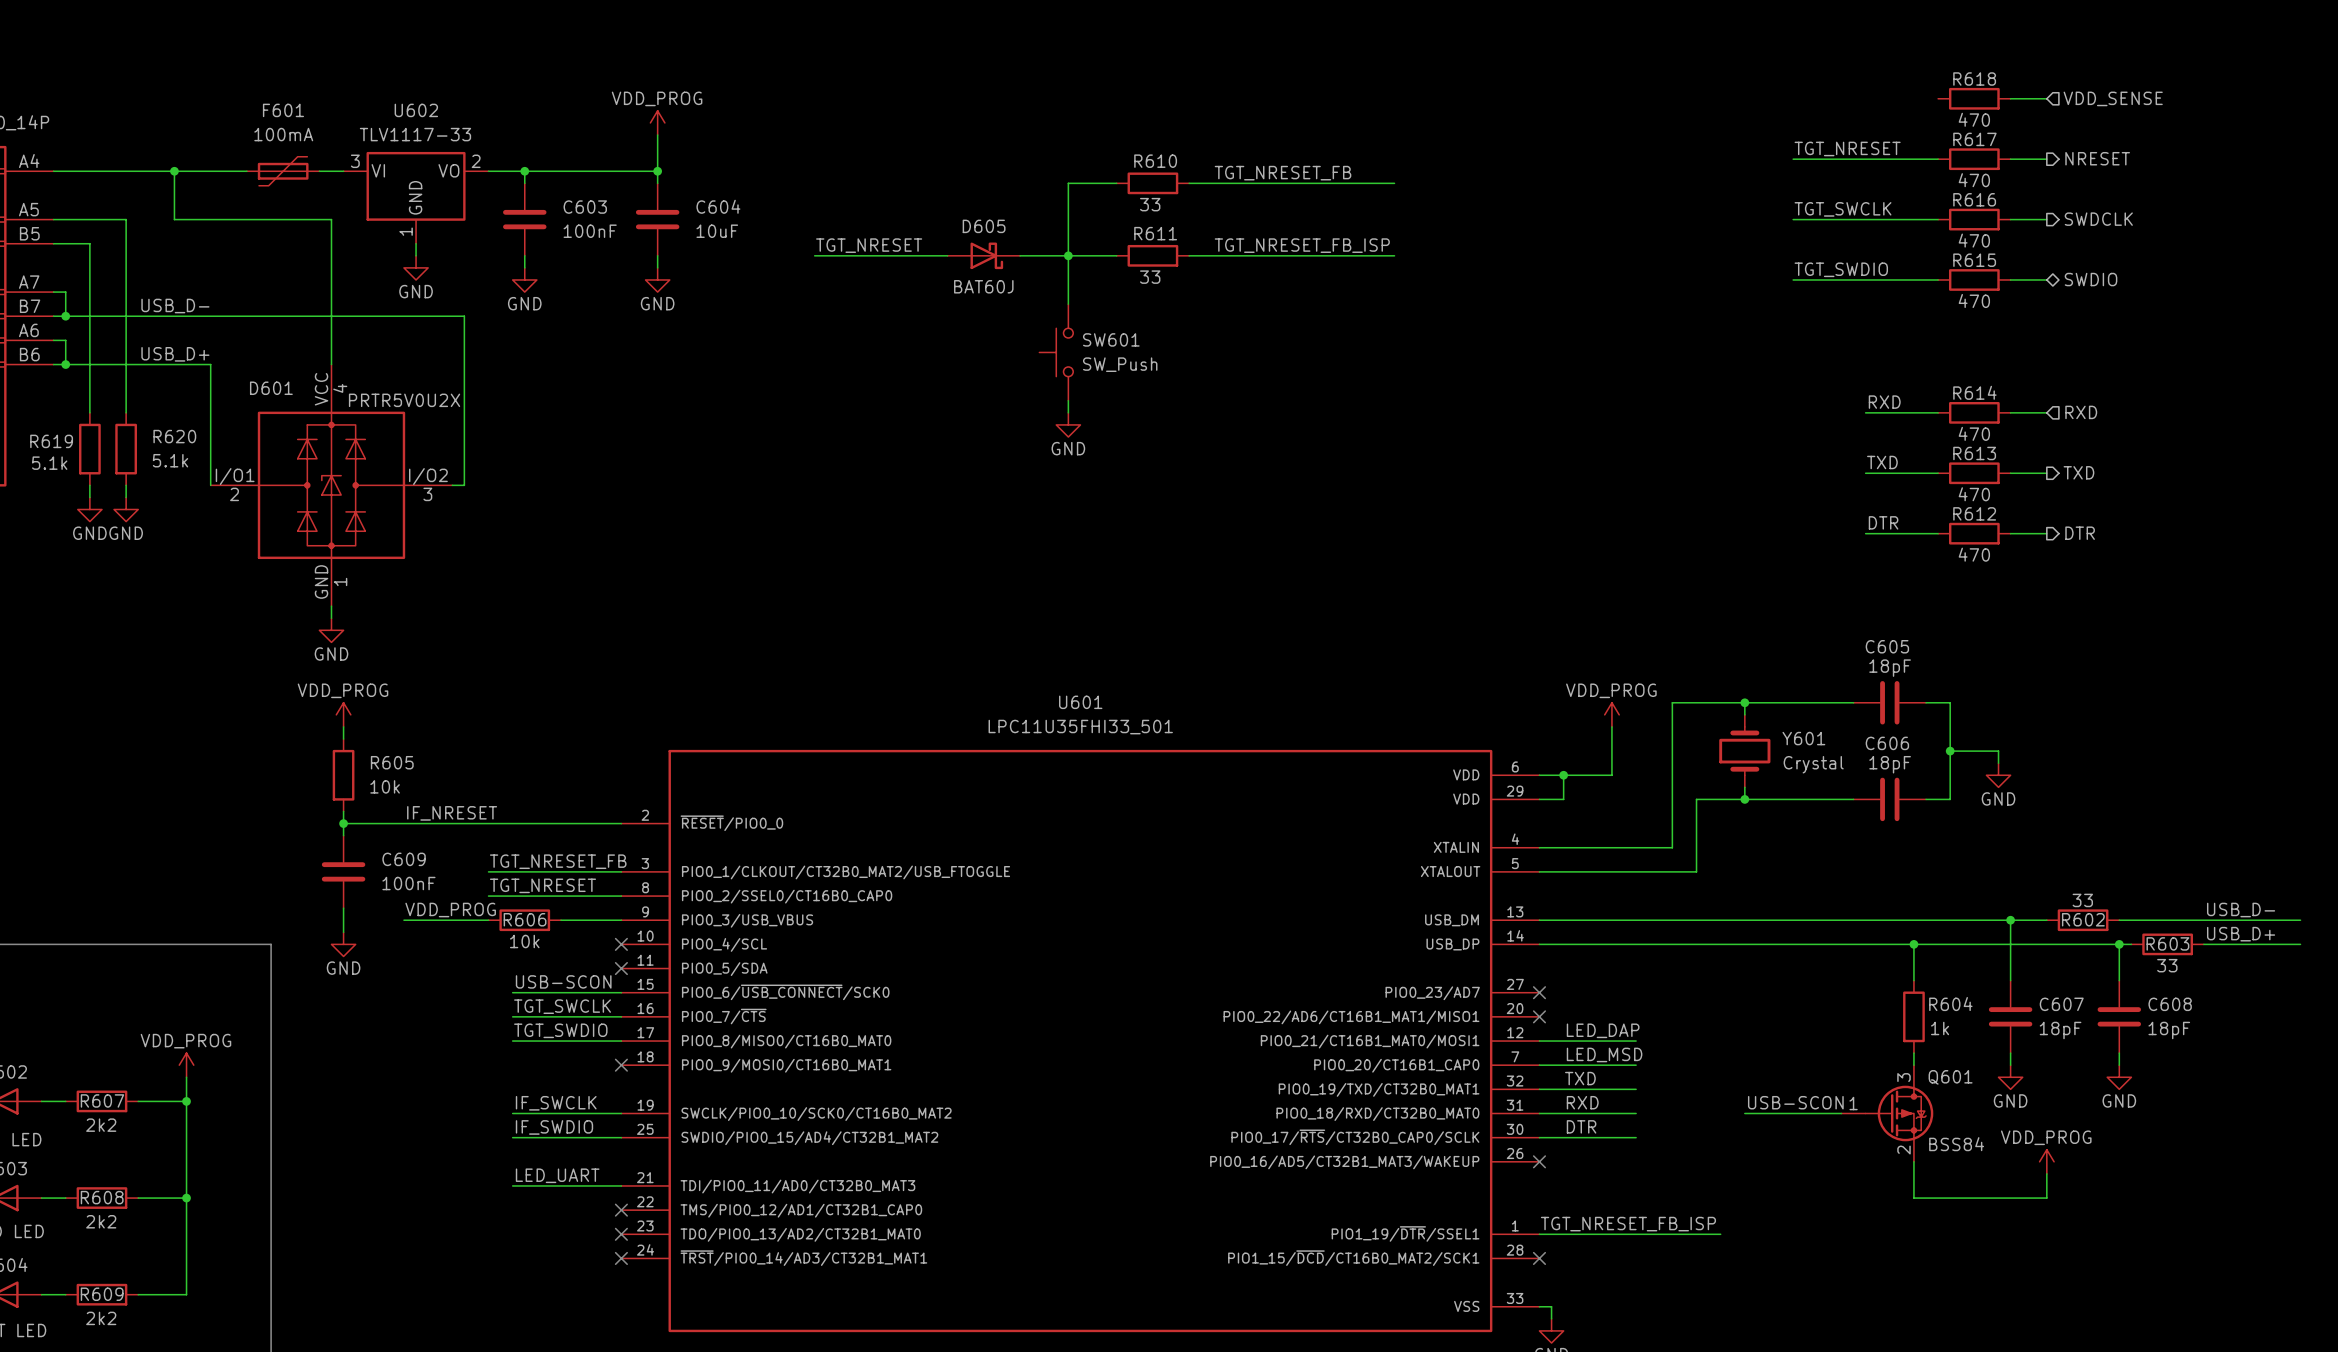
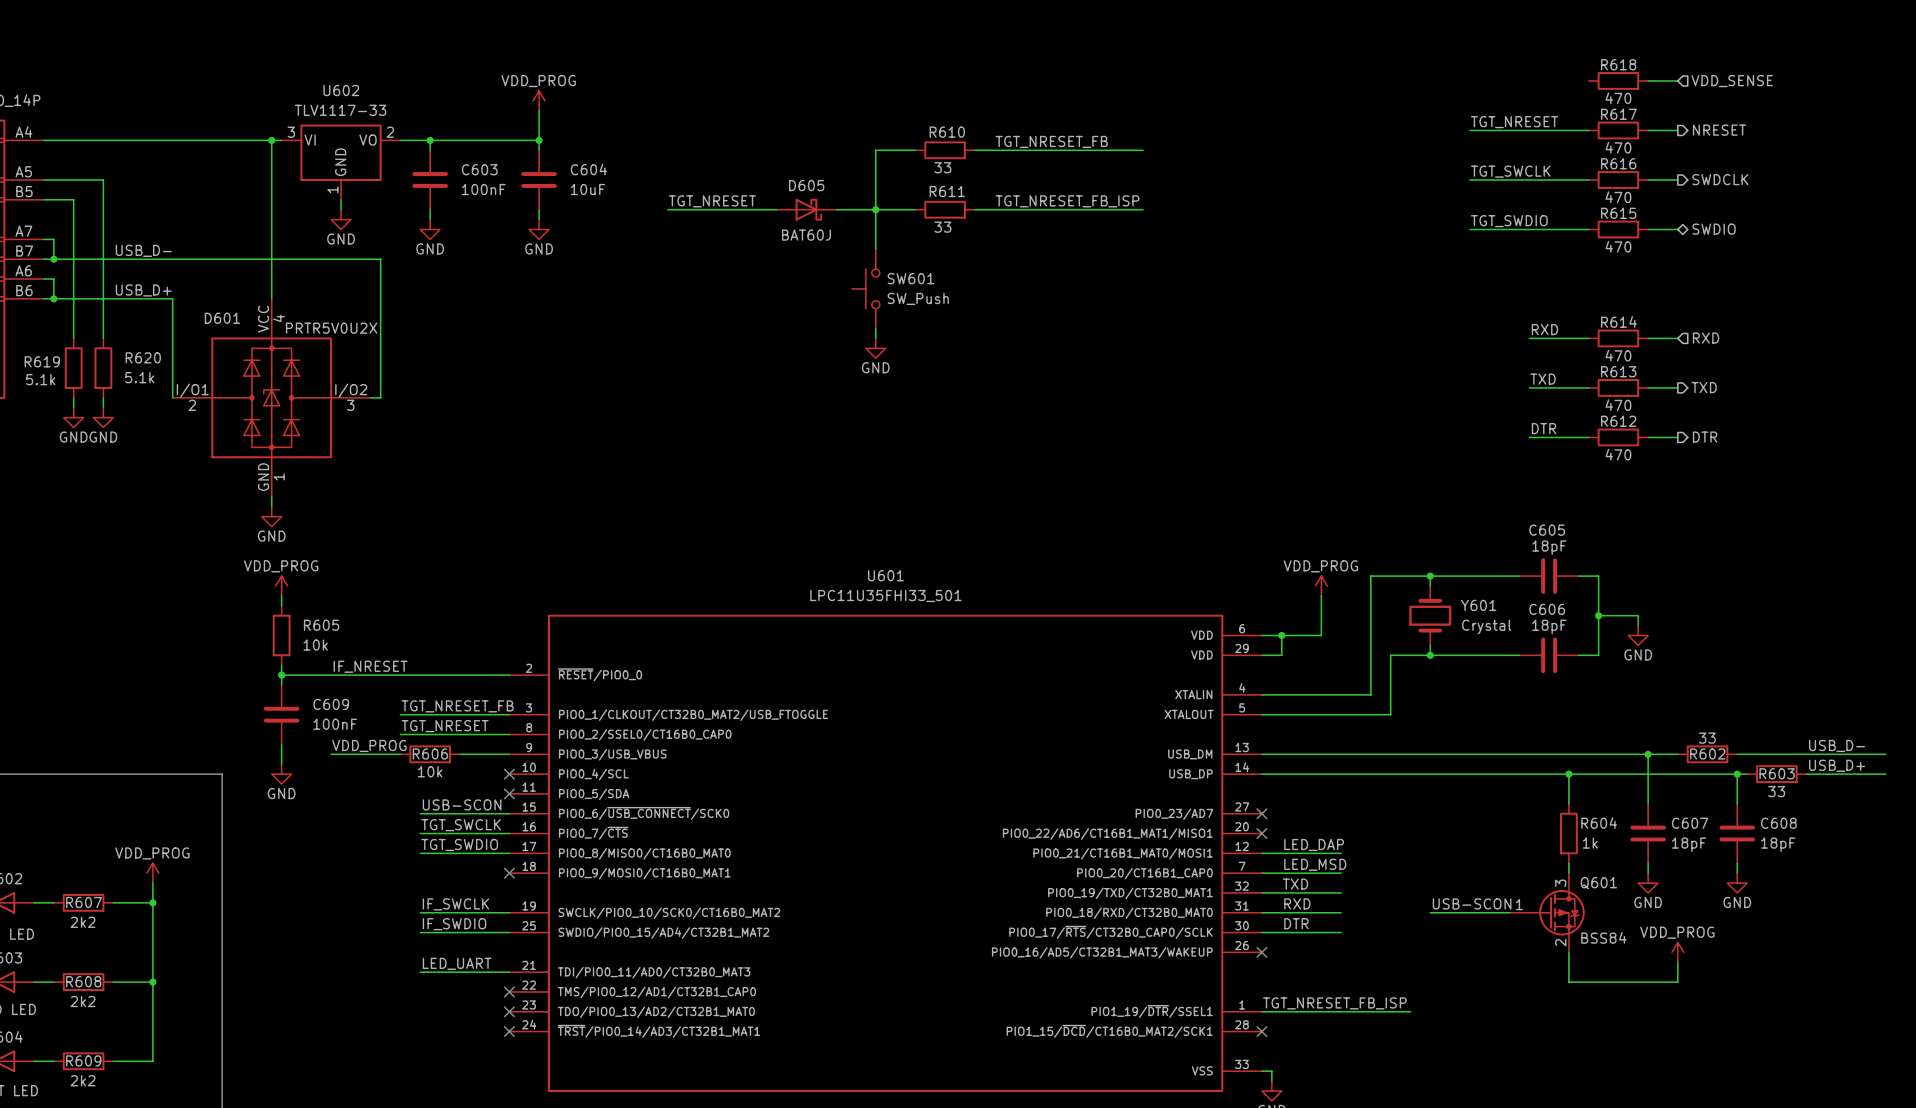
wire: (174, 171) (174, 219) (331, 219) -> (271, 140) (271, 180)
junction: (174, 171) -> none
F601: 100mA (283, 171) -> none
junction: none -> (271, 140)

